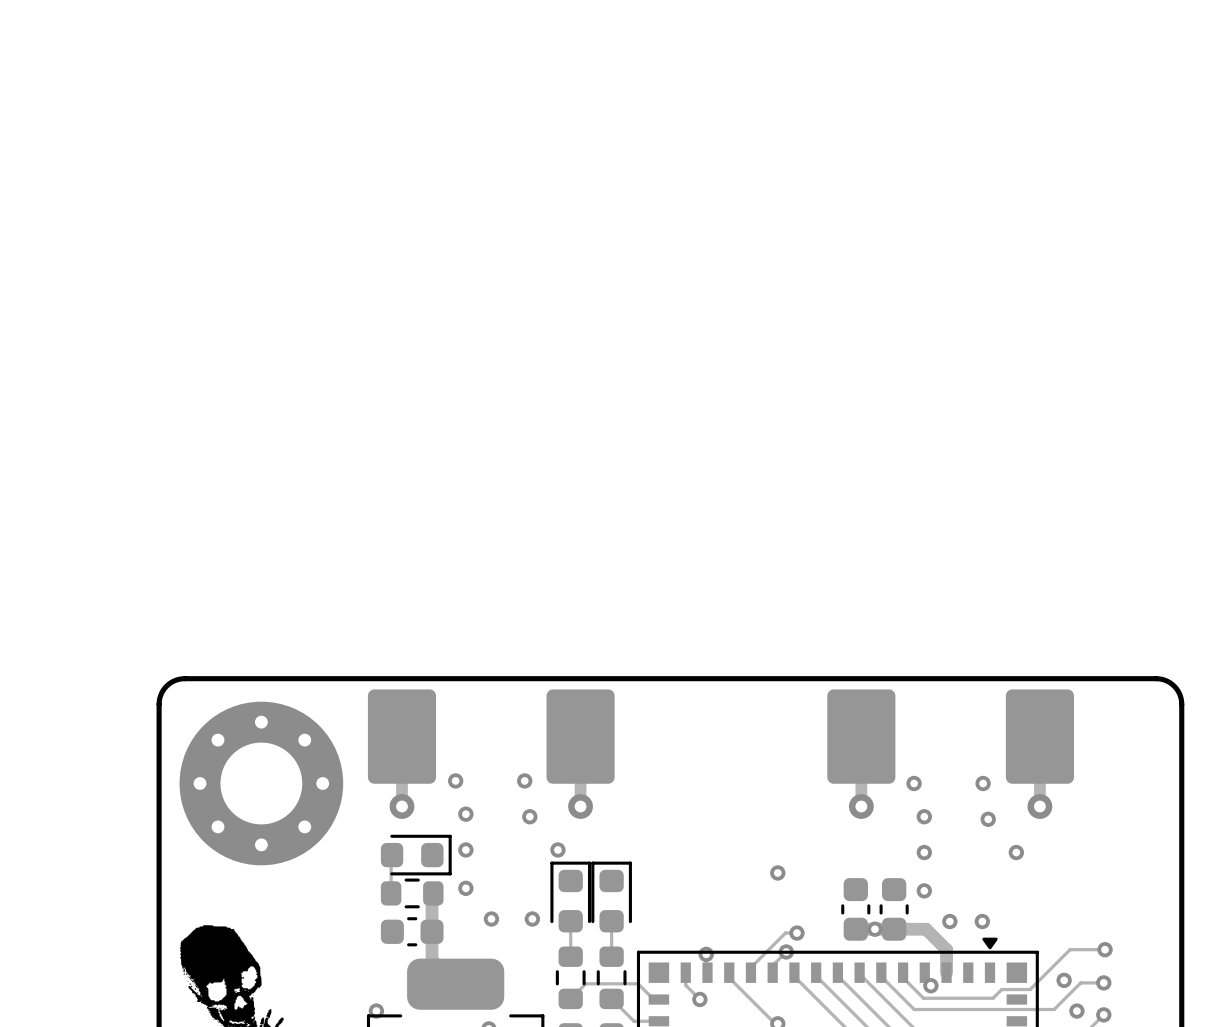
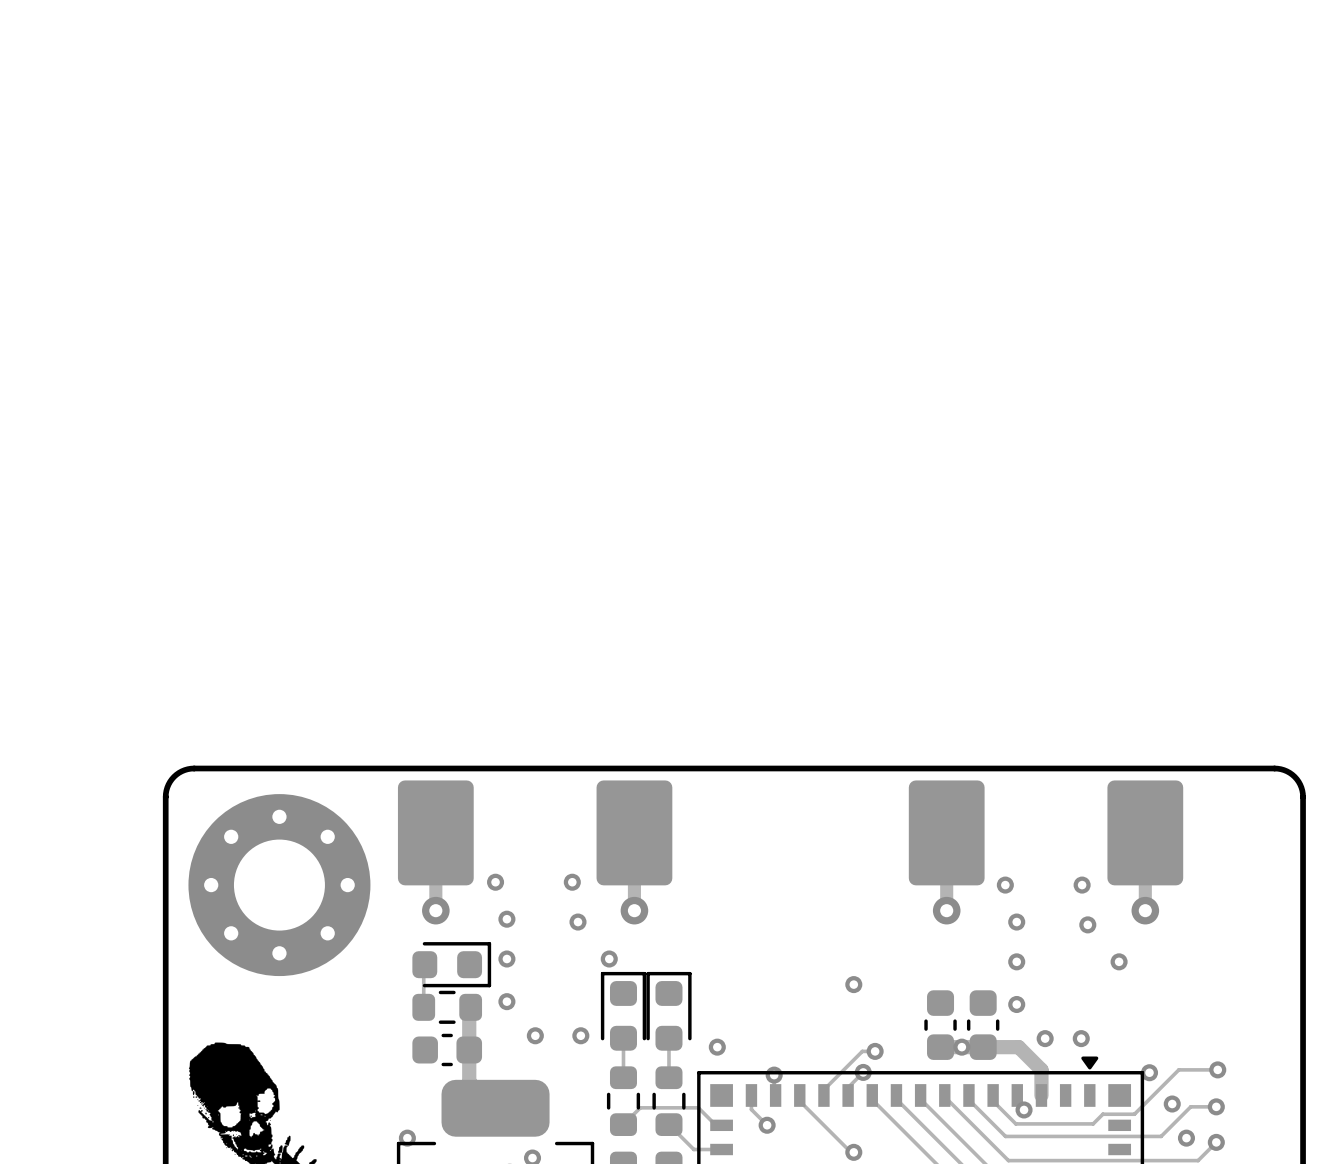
via: none -> (717, 1047)
via: none -> (1149, 1072)

